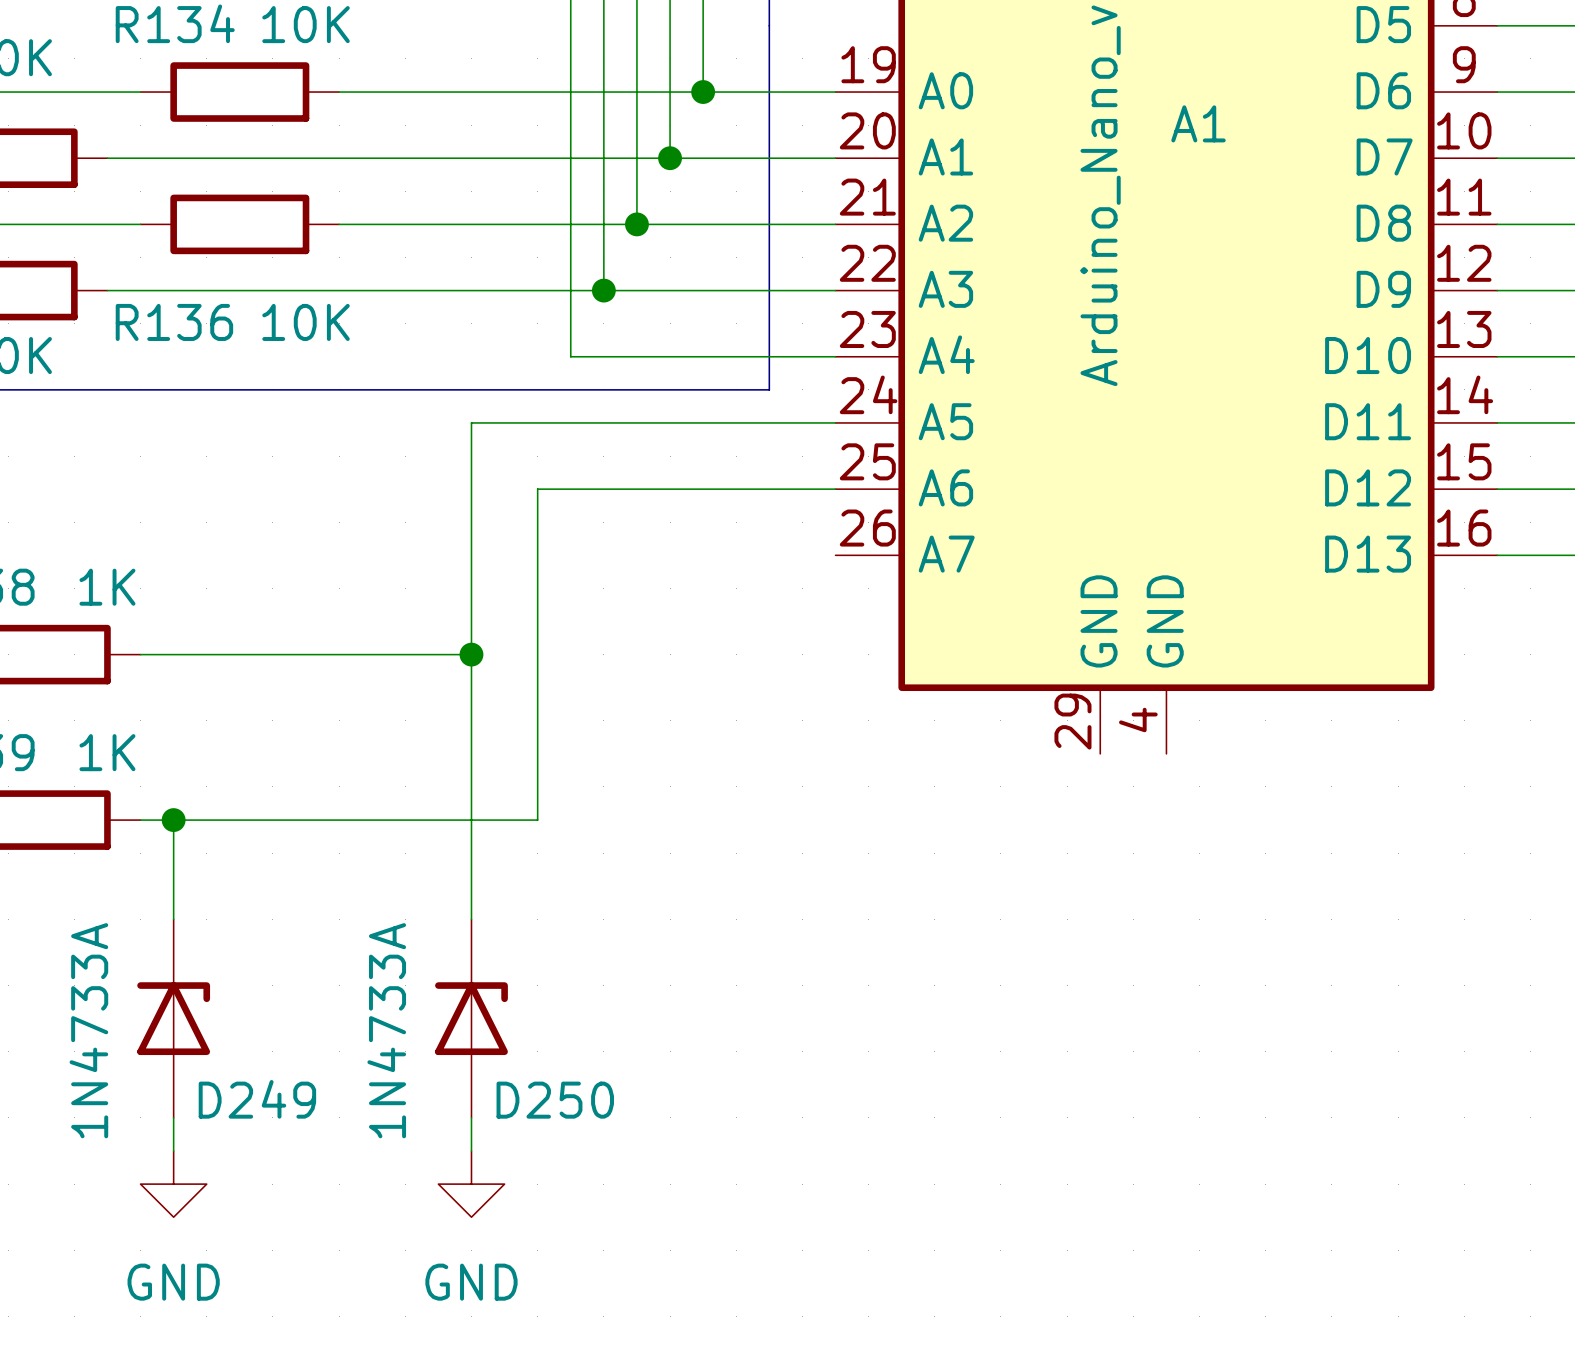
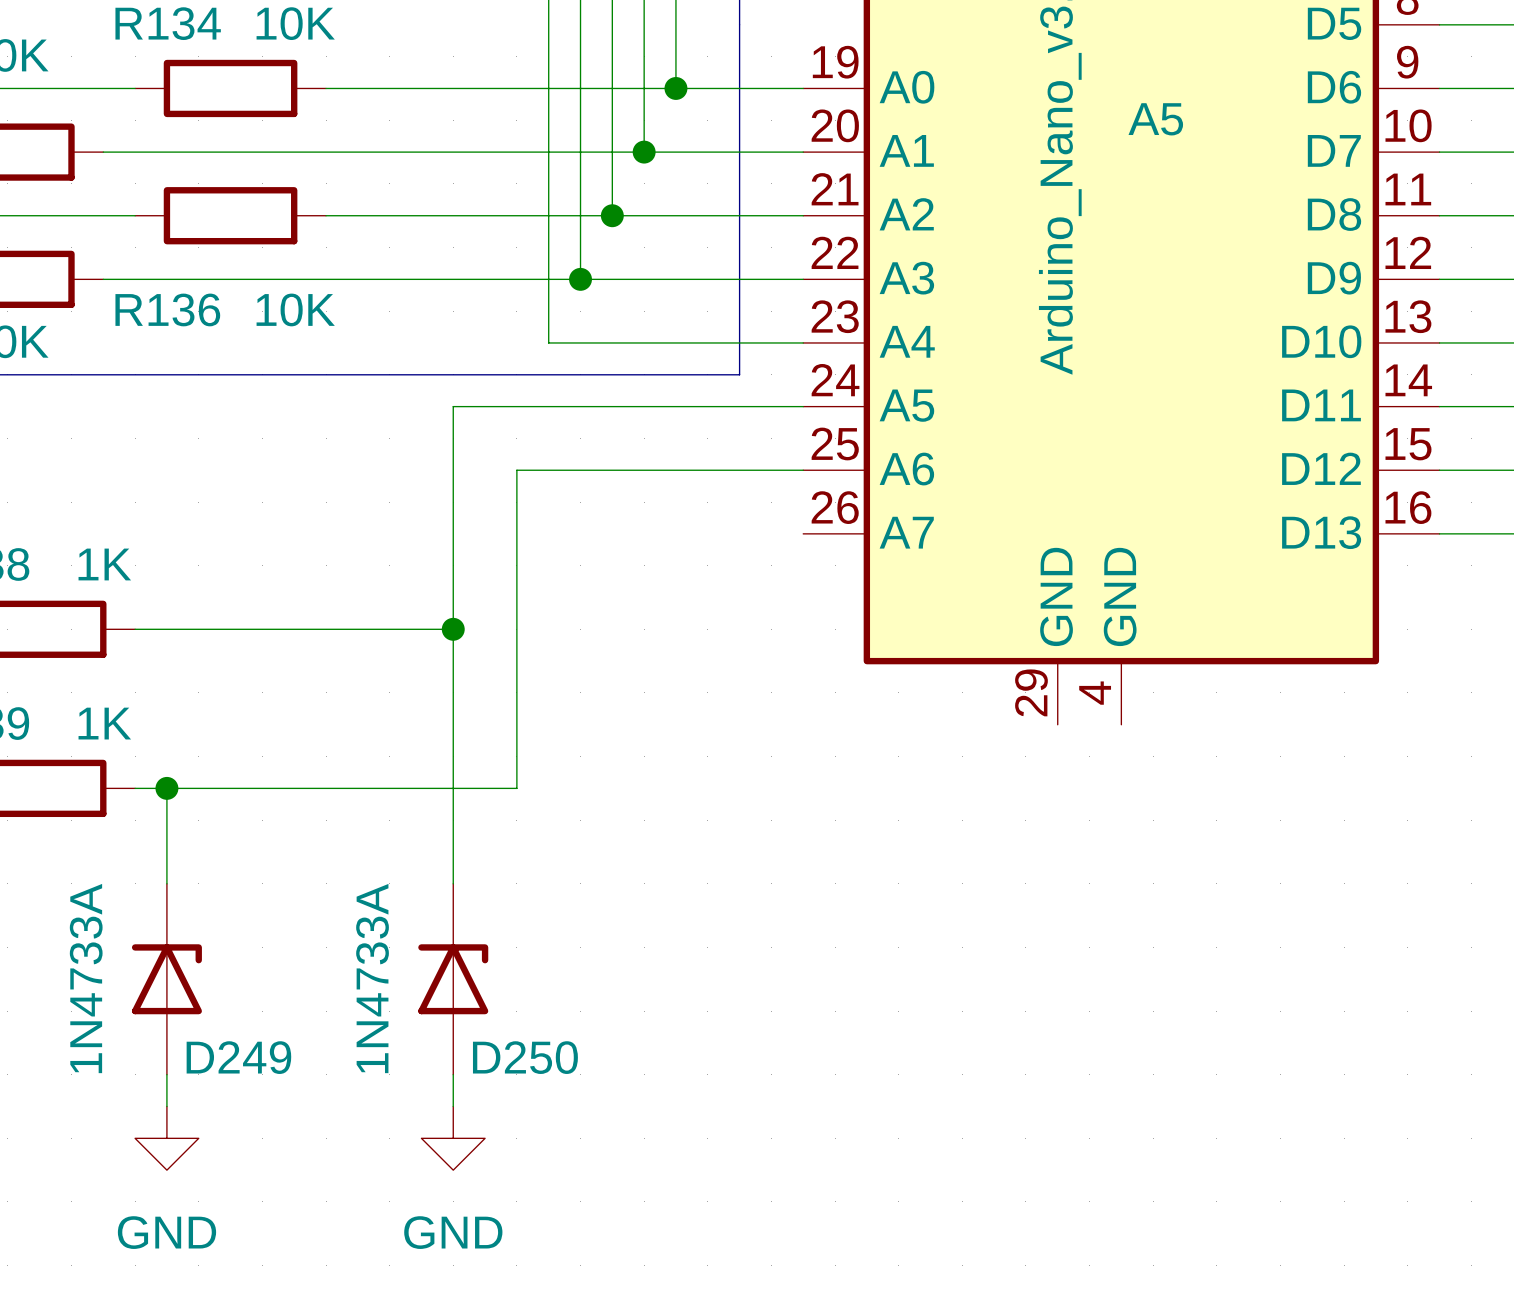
A1 name: A1 (1198, 123) -> A5 (1155, 119)

